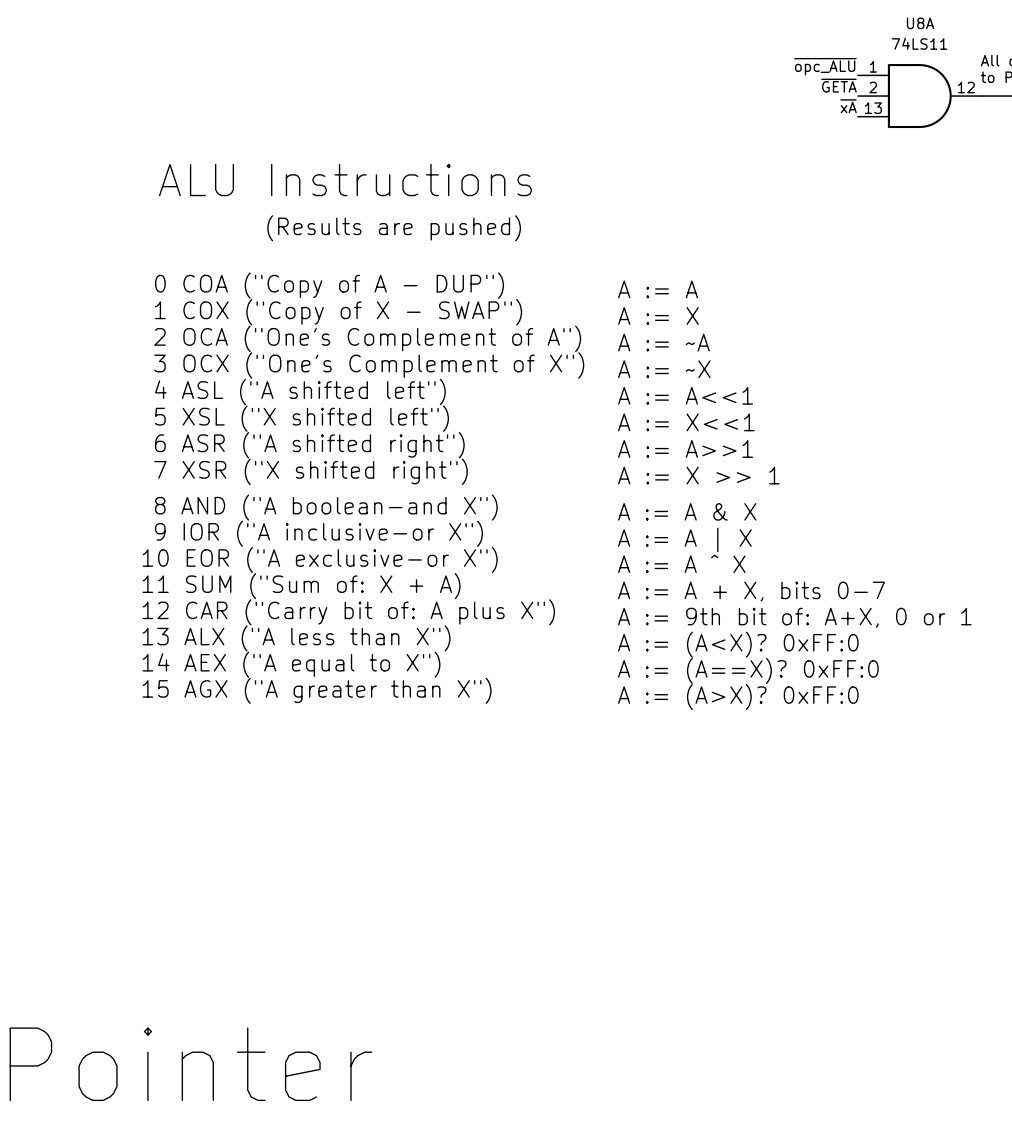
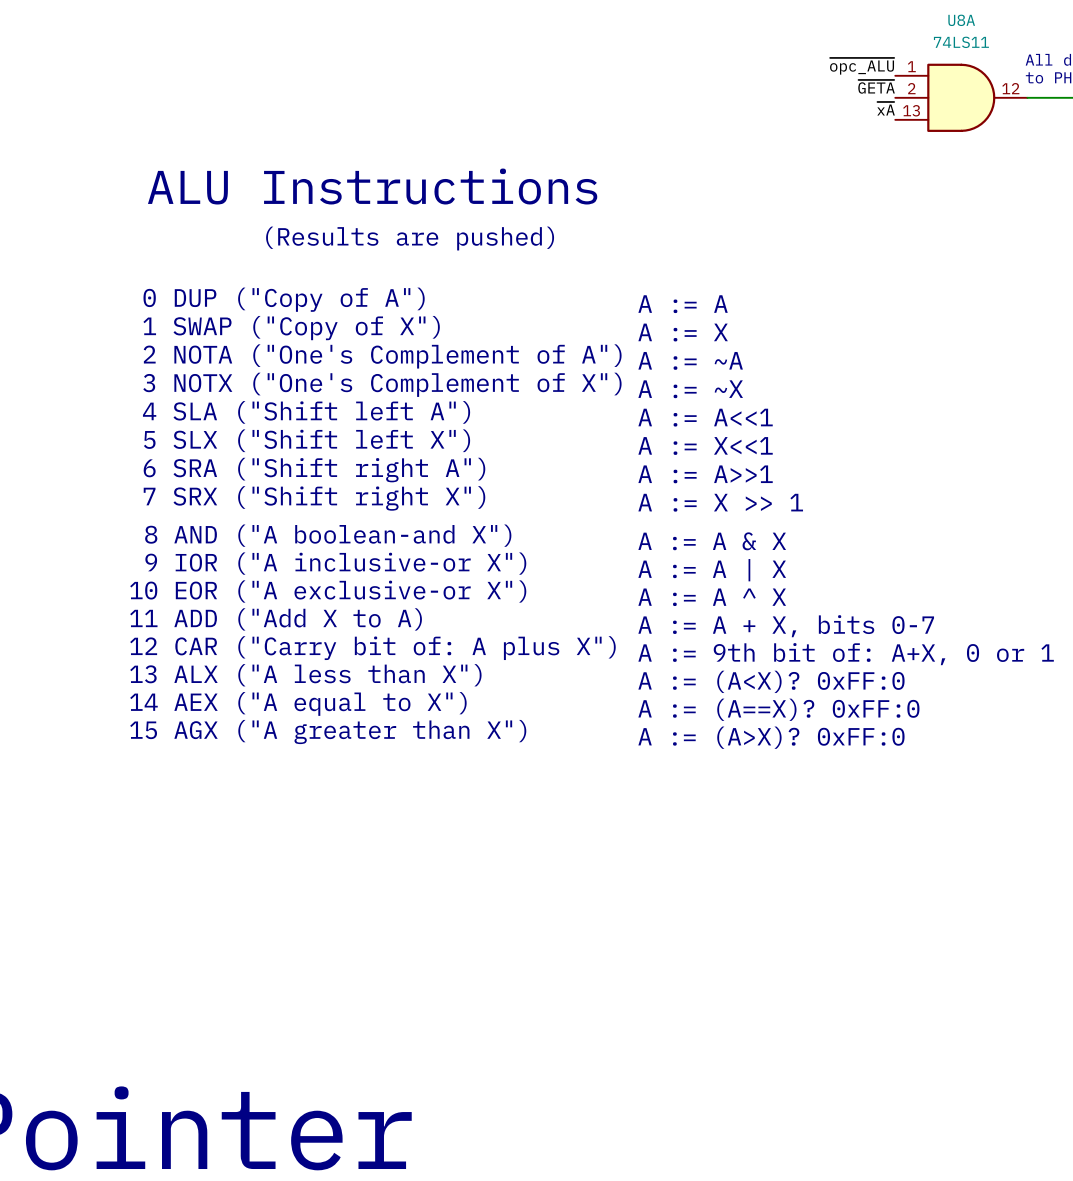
text: 0 COA ("Copy of A - DUP") (329, 285) -> 0 DUP ("Copy of A") (284, 299)
text: 1 COX ("Copy of X - SWAP") (338, 312) -> 1 SWAP ("Copy of X") (291, 328)
text: 2 OCA ("One's Complement of A") (367, 338) -> 2 NOTA ("One's Complement of A") (382, 356)
text: 3 OCX ("One's Complement of X") (369, 365) -> 3 NOTX ("One's Complement of X") (382, 384)
text: 4 ASL ("A shifted left") (300, 392) -> 4 SLA ("Shift left A") (306, 412)
text: 5 XSL ("X shifted left") (301, 418) -> 5 SLX ("Shift left X") (307, 440)
text: 6 ASR ("A shifted right") (309, 445) -> 6 SRA ("Shift right A") (314, 470)
text: 7 XSR ("X shifted right") (311, 471) -> 7 SRX ("Shift right X") (314, 498)
text: 11 SUM ("Sum of: X + A) (301, 586) -> 11 ADD ("Add X to A) (276, 619)

